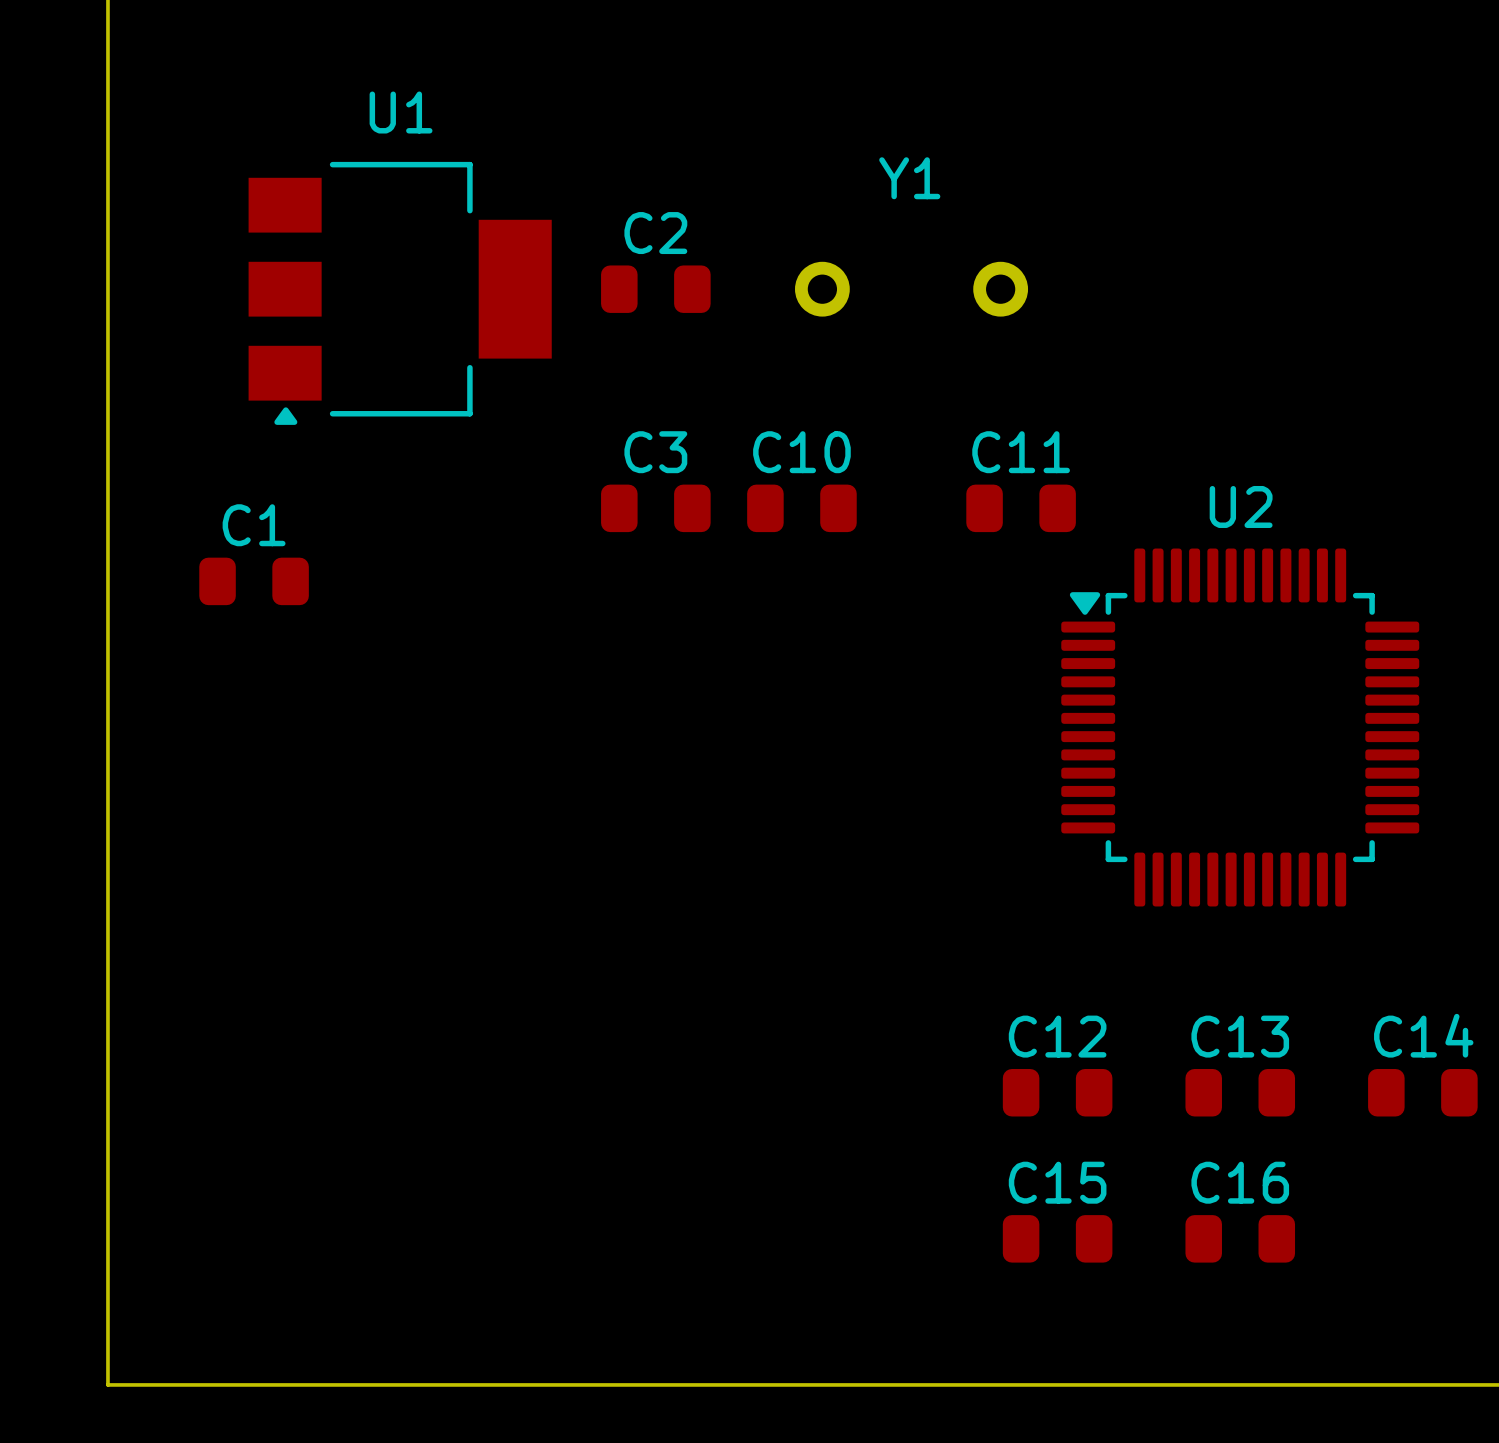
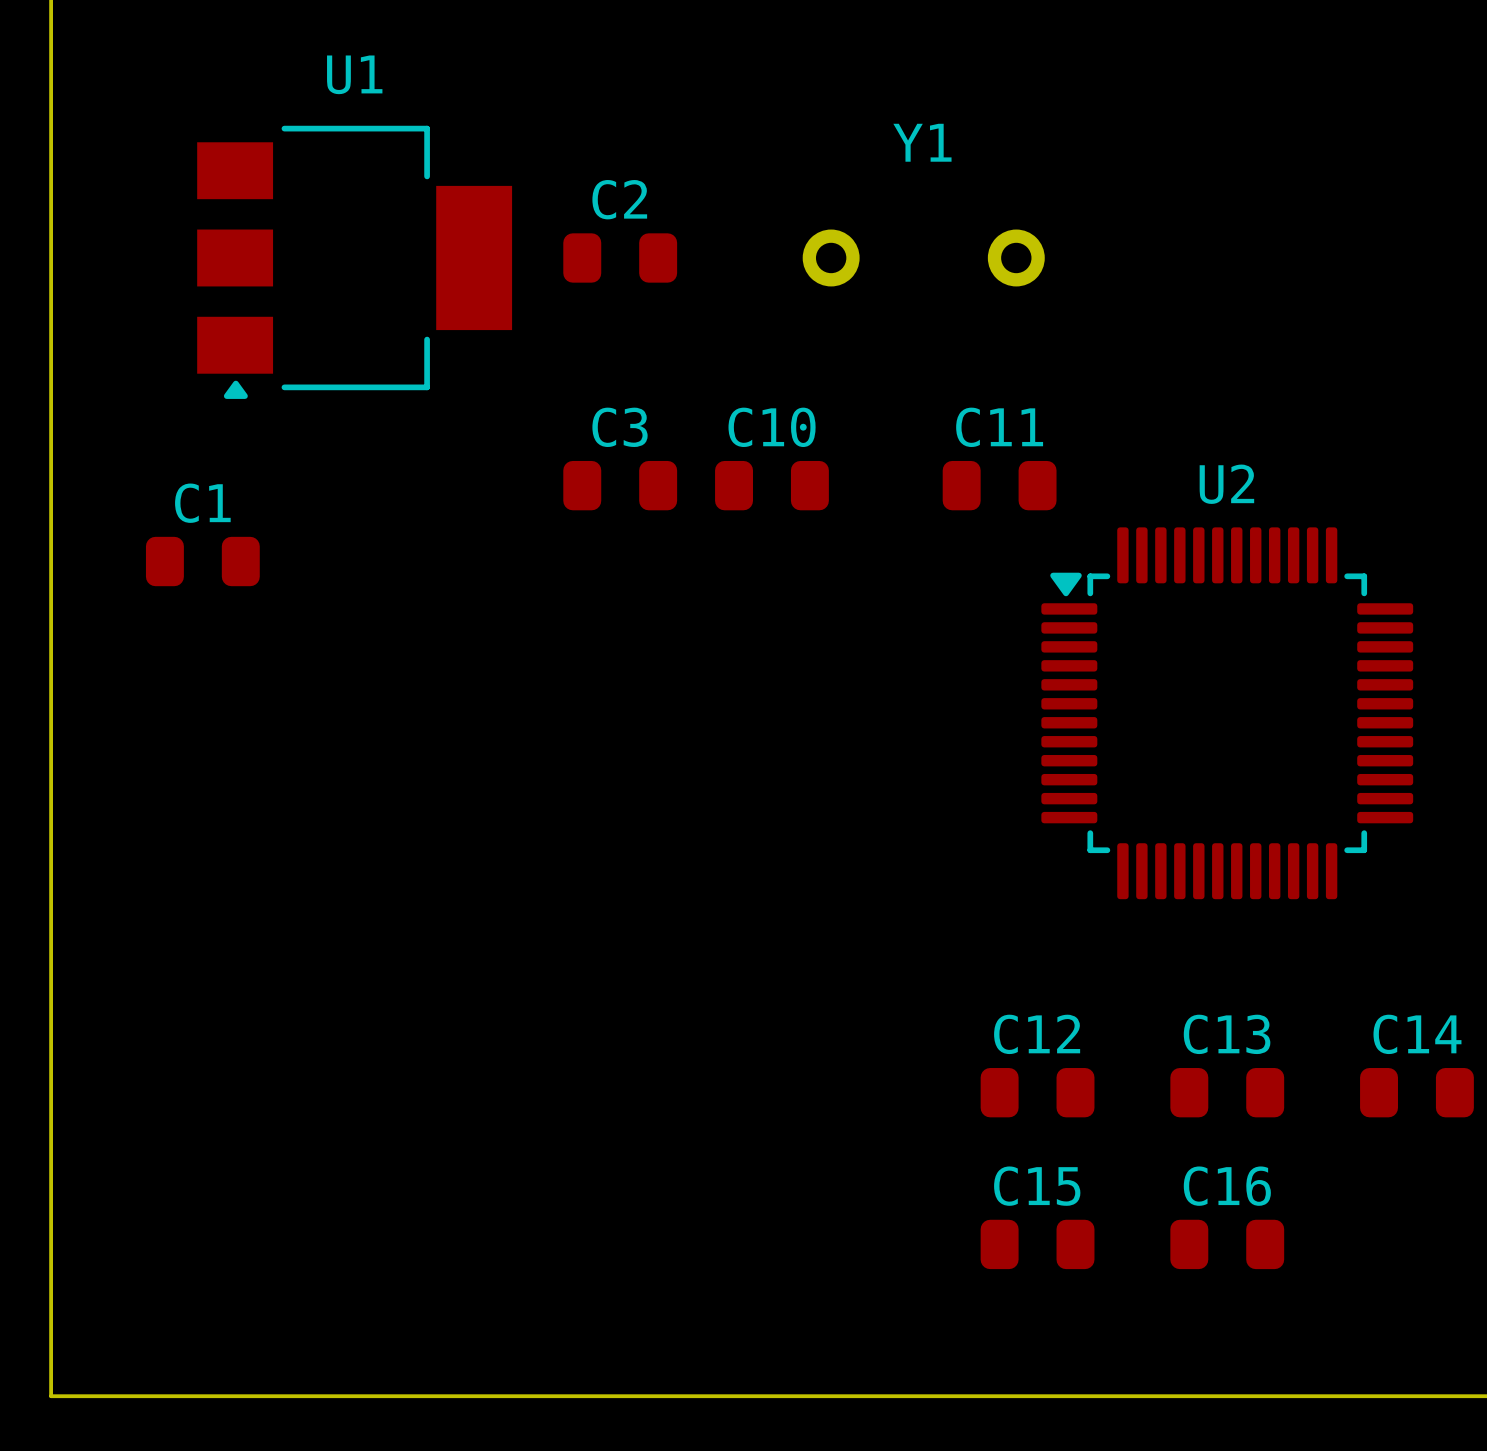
Y1 position: (911, 289) -> (923, 257)

